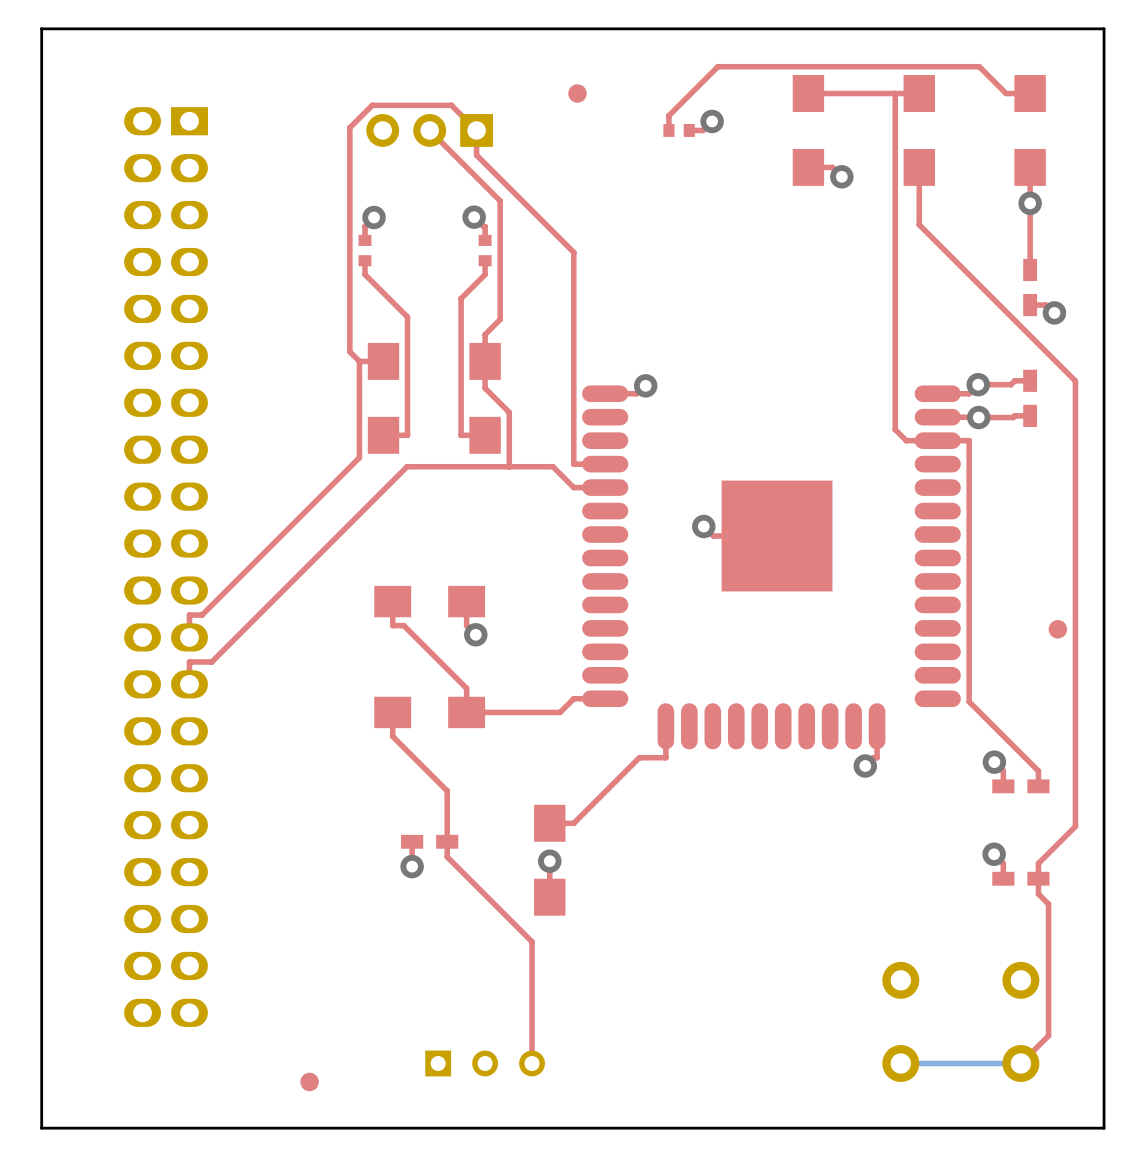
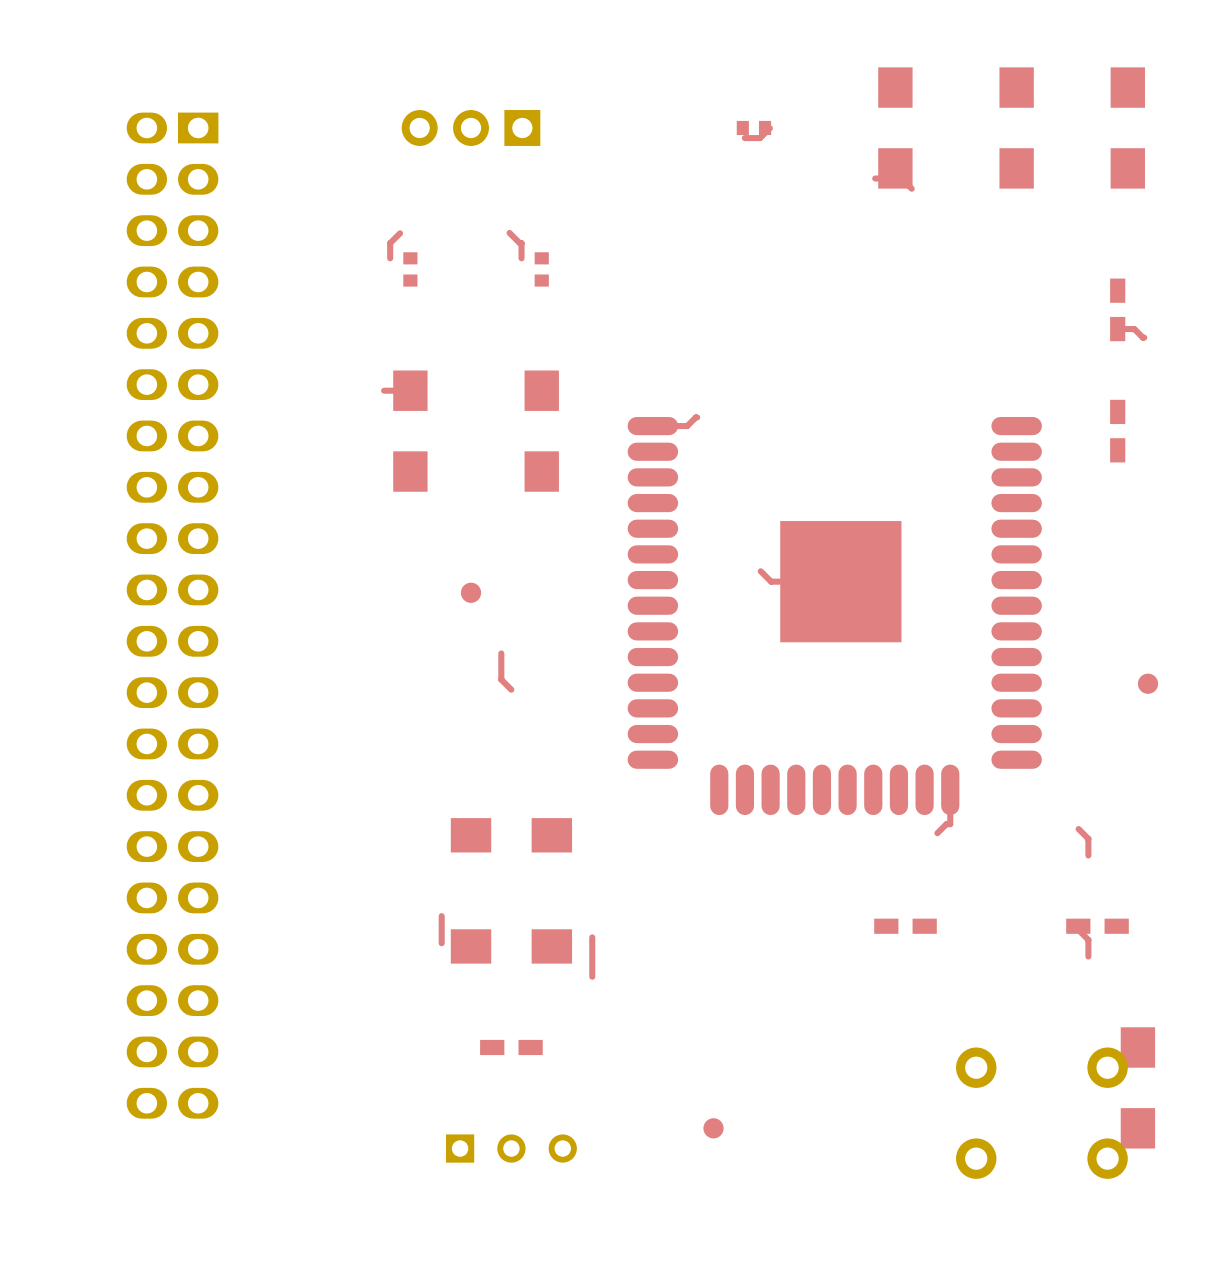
board edge: (1104, 28) (1104, 1128) (41, 1128) (41, 28) (1104, 28) -> none
part: (577, 93) -> none
top track: (895, 93) (895, 429) (906, 440) (969, 440) (969, 701) (1038, 771) (1038, 786) -> none
top track: (919, 93) (808, 93) -> none
top track: (1030, 93) (1006, 93) (979, 66) (717, 66) (668, 115) (668, 130) -> none
via: (712, 121) -> none
top track: (429, 130) (500, 201) (500, 319) (485, 334) (485, 388) (509, 412) (509, 466) -> none
part position: (429, 130) -> (471, 127)
part position: (679, 130) -> (753, 127)
part position: (808, 130) -> (895, 127)
part position: (919, 130) -> (1016, 127)
part position: (1030, 130) -> (1127, 127)
top track: (919, 167) (919, 224) (1075, 381) (1075, 826) (1038, 863) (1038, 893) (1048, 904) (1048, 1035) (1020, 1063) -> none
top track: (1030, 167) (1030, 269) -> none
via: (841, 176) -> none
via: (1030, 203) -> none
via: (374, 217) -> none
via: (474, 217) -> none
part position: (365, 250) -> (410, 269)
part position: (485, 250) -> (541, 269)
top track: (365, 260) (365, 274) (407, 317) (407, 435) (383, 435) -> none
top track: (485, 260) (485, 274) (461, 298) (461, 435) (485, 435) -> none
via: (1054, 312) -> none
top track: (1030, 380) (1014, 380) (1011, 384) (978, 384) (969, 393) (937, 393) -> none
via: (978, 384) -> none
via: (645, 385) -> none
part position: (485, 398) -> (541, 431)
top track: (1030, 415) (937, 417) -> none
via: (978, 417) -> none
top track: (605, 464) (573, 464) (573, 252) (476, 155) (476, 130) (451, 105) (372, 105) (349, 127) (349, 351) (359, 361) (359, 457) (202, 615) (189, 615) (189, 637) -> none
top track: (605, 487) (573, 487) (552, 466) (407, 466) (211, 661) (189, 661) (189, 684) -> none
via: (703, 526) -> none
part: none -> (471, 592)
top track: (392, 601) (392, 625) (403, 625) (466, 688) (466, 712) (560, 712) (573, 698) (605, 698) -> none
part: (429, 601) -> none
via: (475, 634) -> none
top track: (392, 712) (392, 736) (447, 790) (447, 857) (532, 941) (532, 1063) -> none
part: (429, 712) -> none
top track: (665, 726) (665, 757) (639, 757) (573, 823) (549, 823) -> none
via: (994, 762) -> none
via: (865, 765) -> none
part: none -> (511, 835)
part: (1020, 786) -> none
part position: (429, 841) -> (511, 1047)
part: none -> (905, 926)
via: (994, 854) -> none
part: (549, 860) -> none
via: (549, 861) -> none
via: (412, 866) -> none
part: none -> (511, 946)
part position: (1020, 878) -> (1097, 926)
part: none -> (1137, 1087)
part: none -> (713, 1128)
part position: (485, 1063) -> (511, 1148)
bottom track: (1020, 1063) (900, 1063) -> none
part: (309, 1081) -> none

